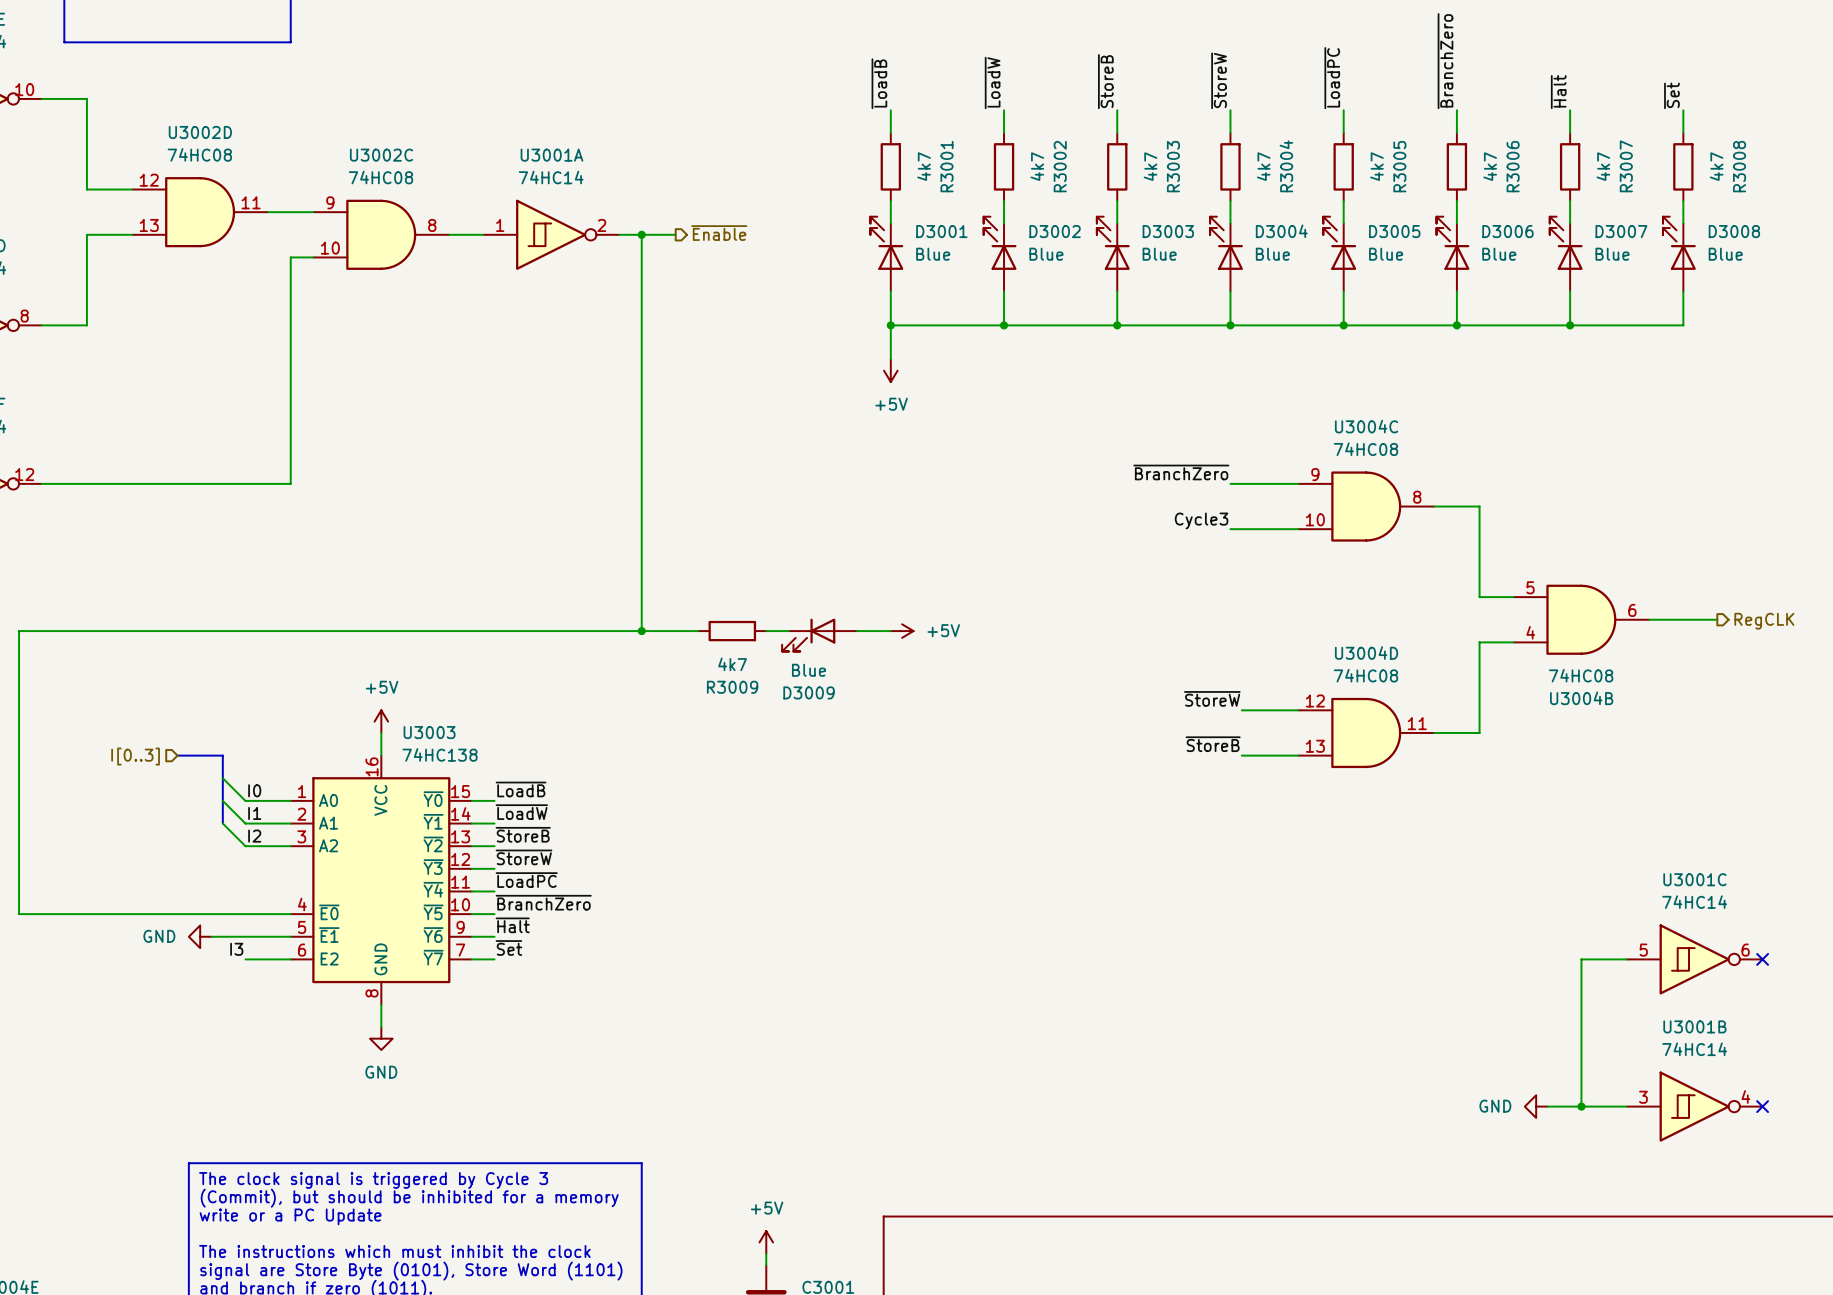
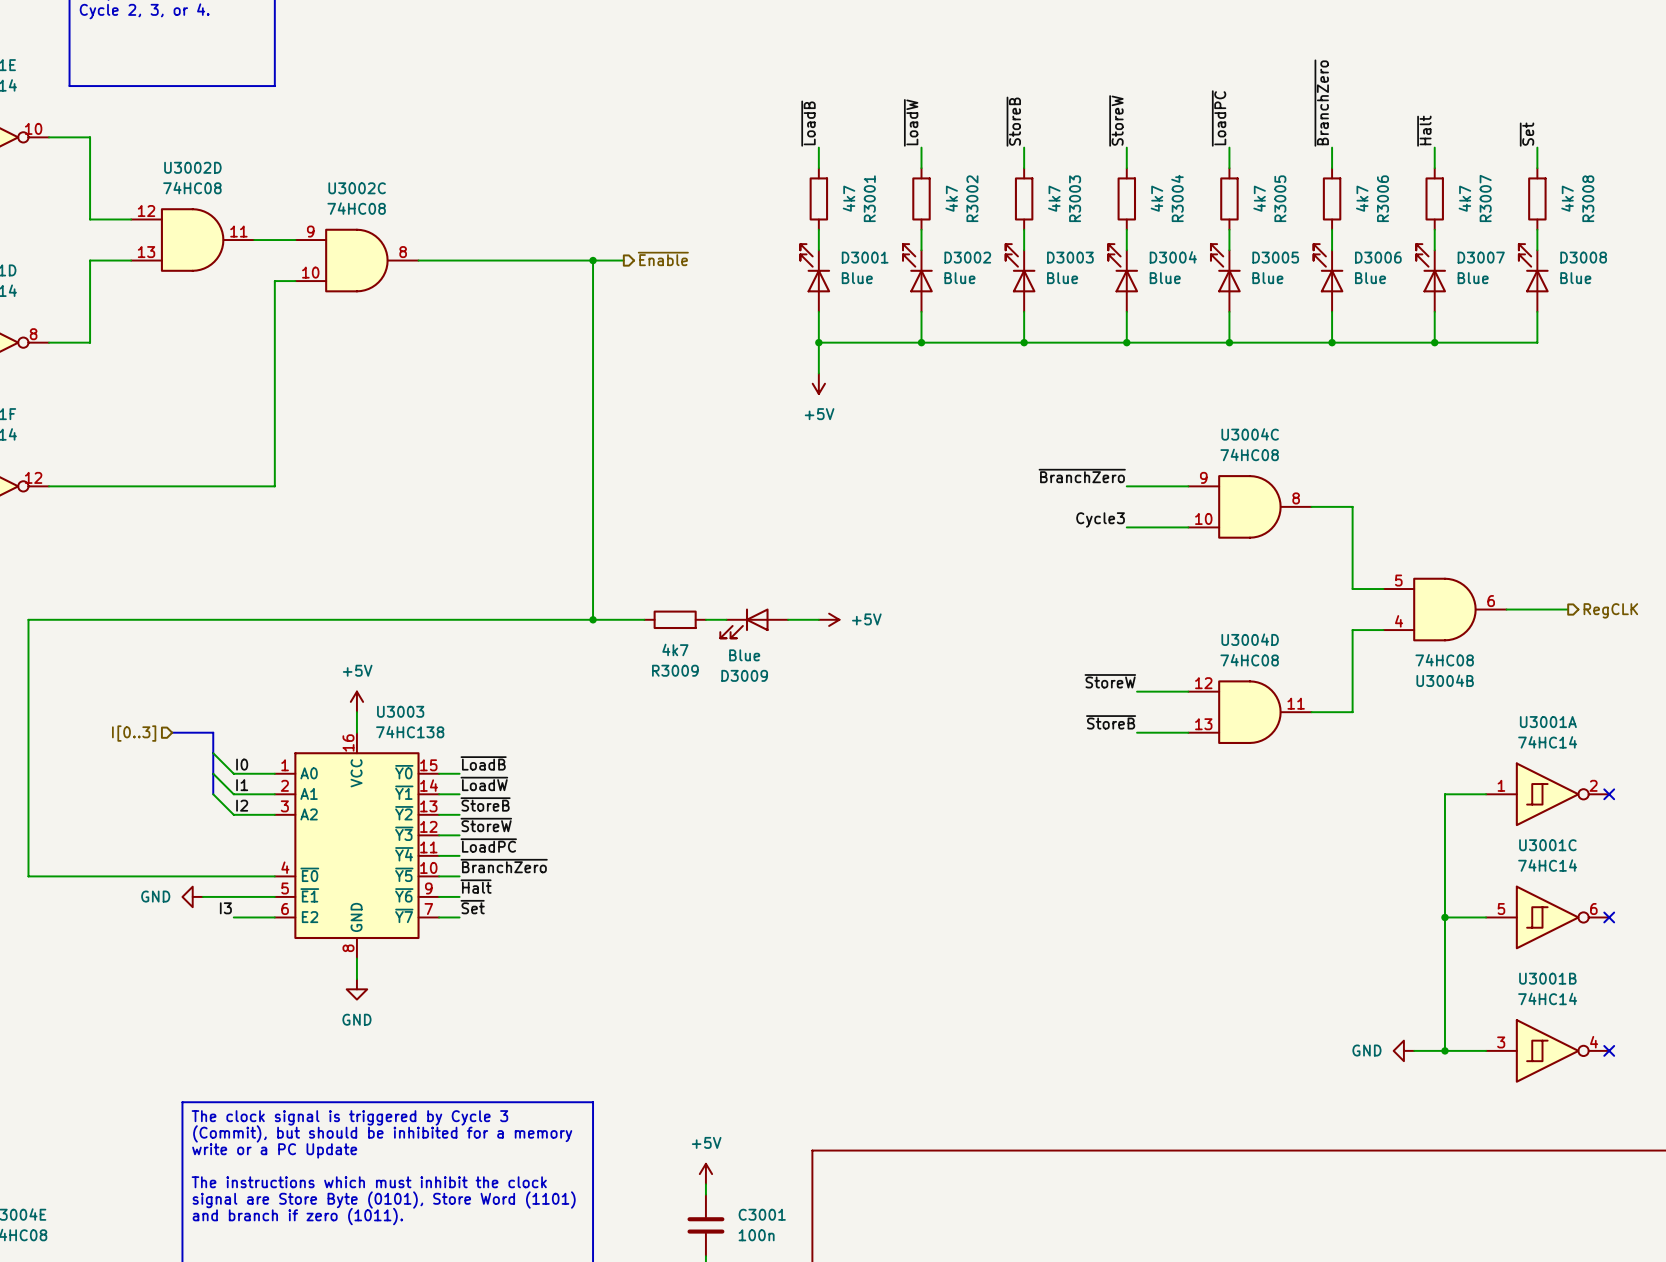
U3001A position: (551, 234) -> (1547, 794)
wire: none -> (1486, 794) (1444, 794) (1444, 917)
no-connect mark: none -> (1609, 794)
junction: none -> (1444, 917)

